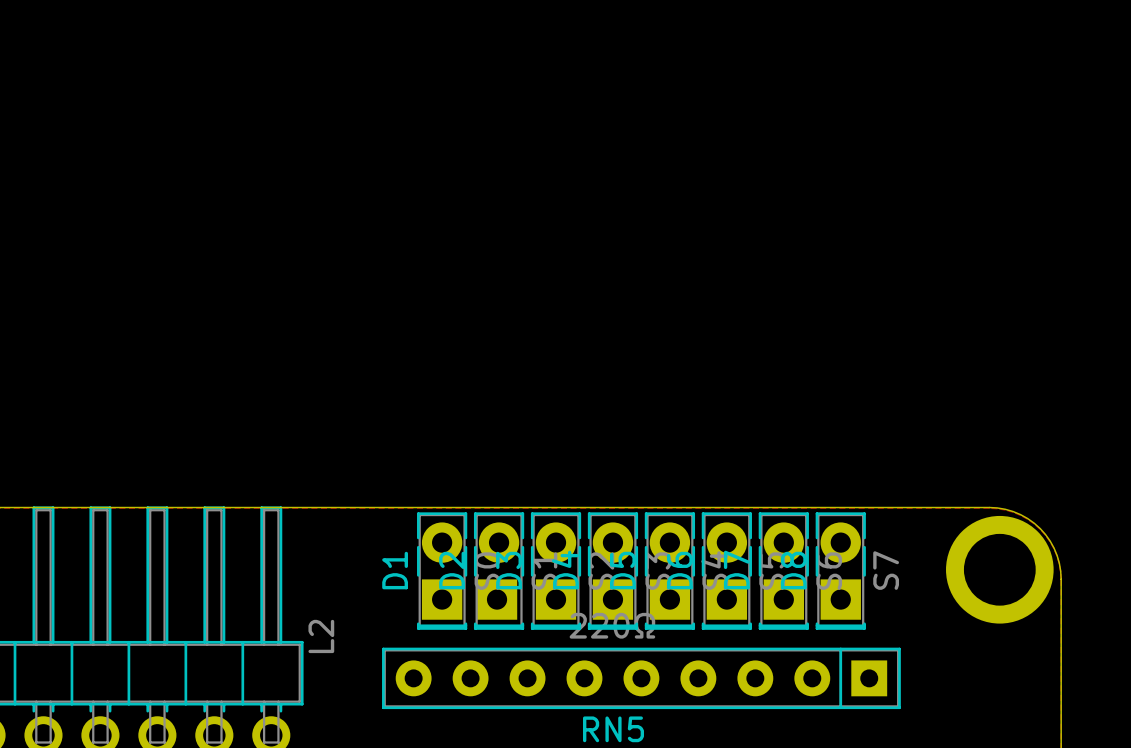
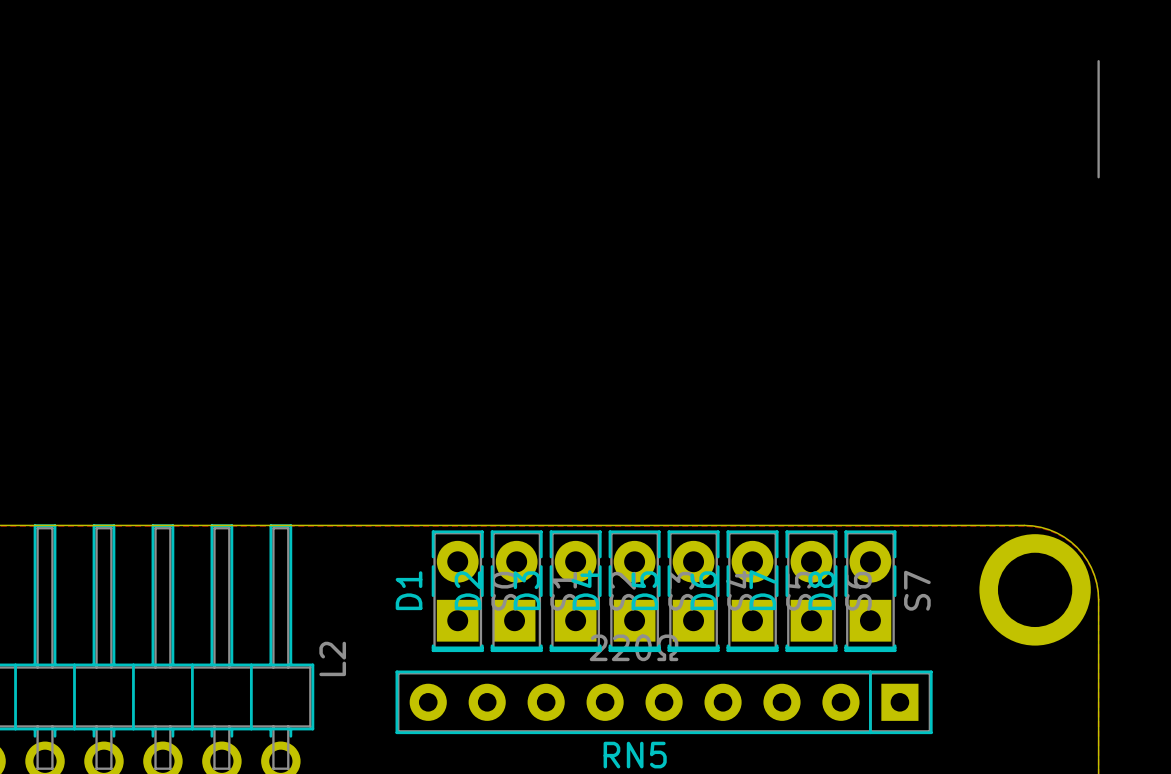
line: none -> (1098, 61) (1098, 177)

